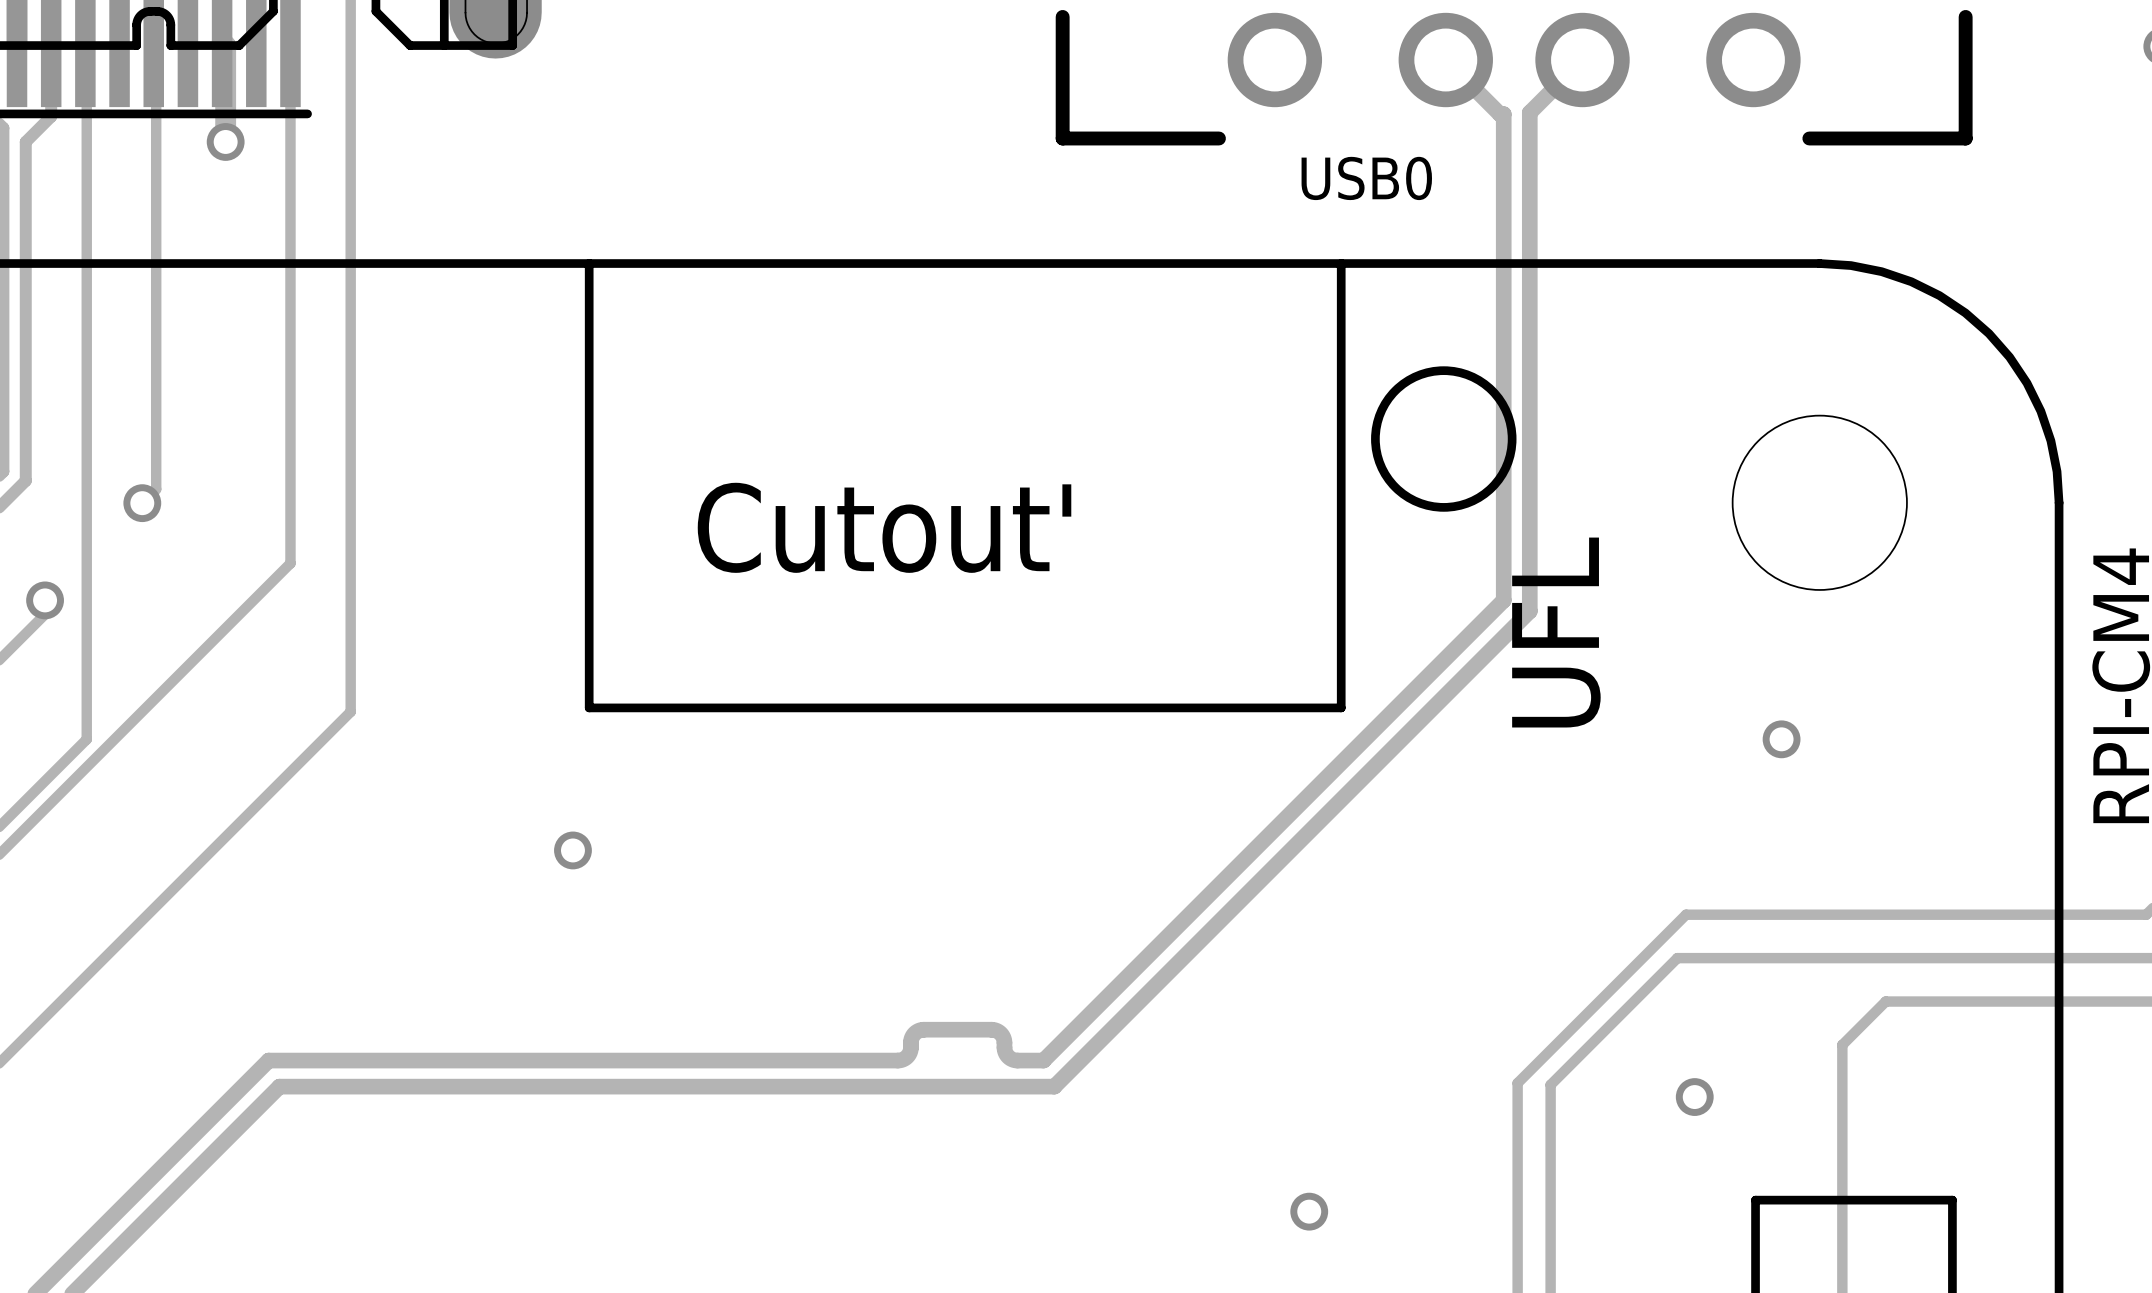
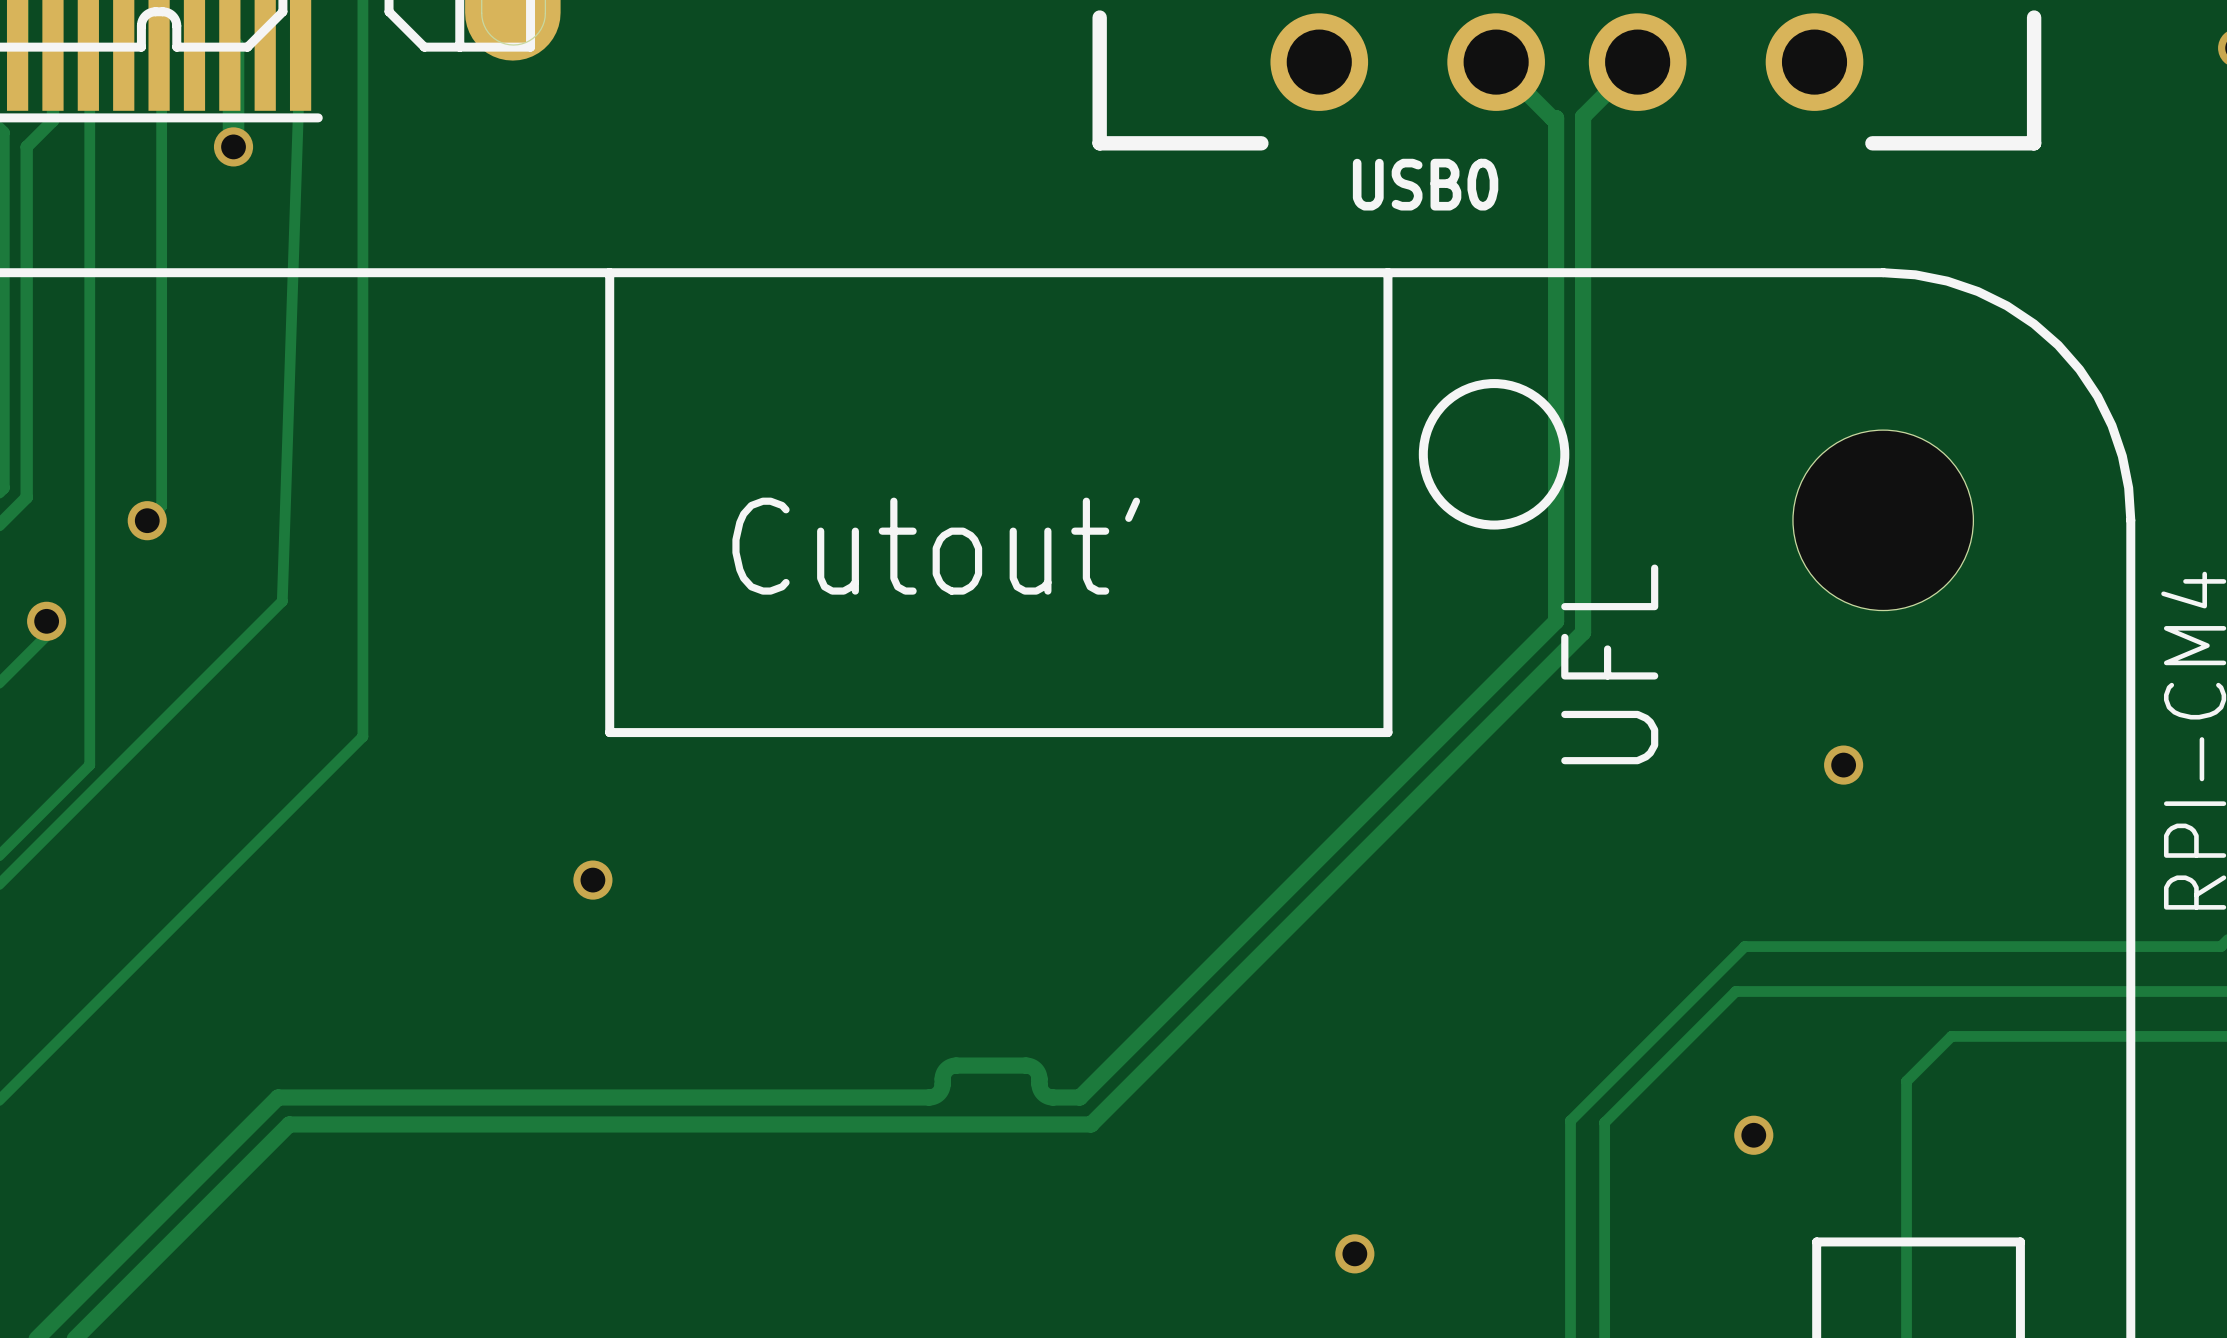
track: (290, 42) (290, 563) (272, 581) -> (300, 43) (282, 601)

